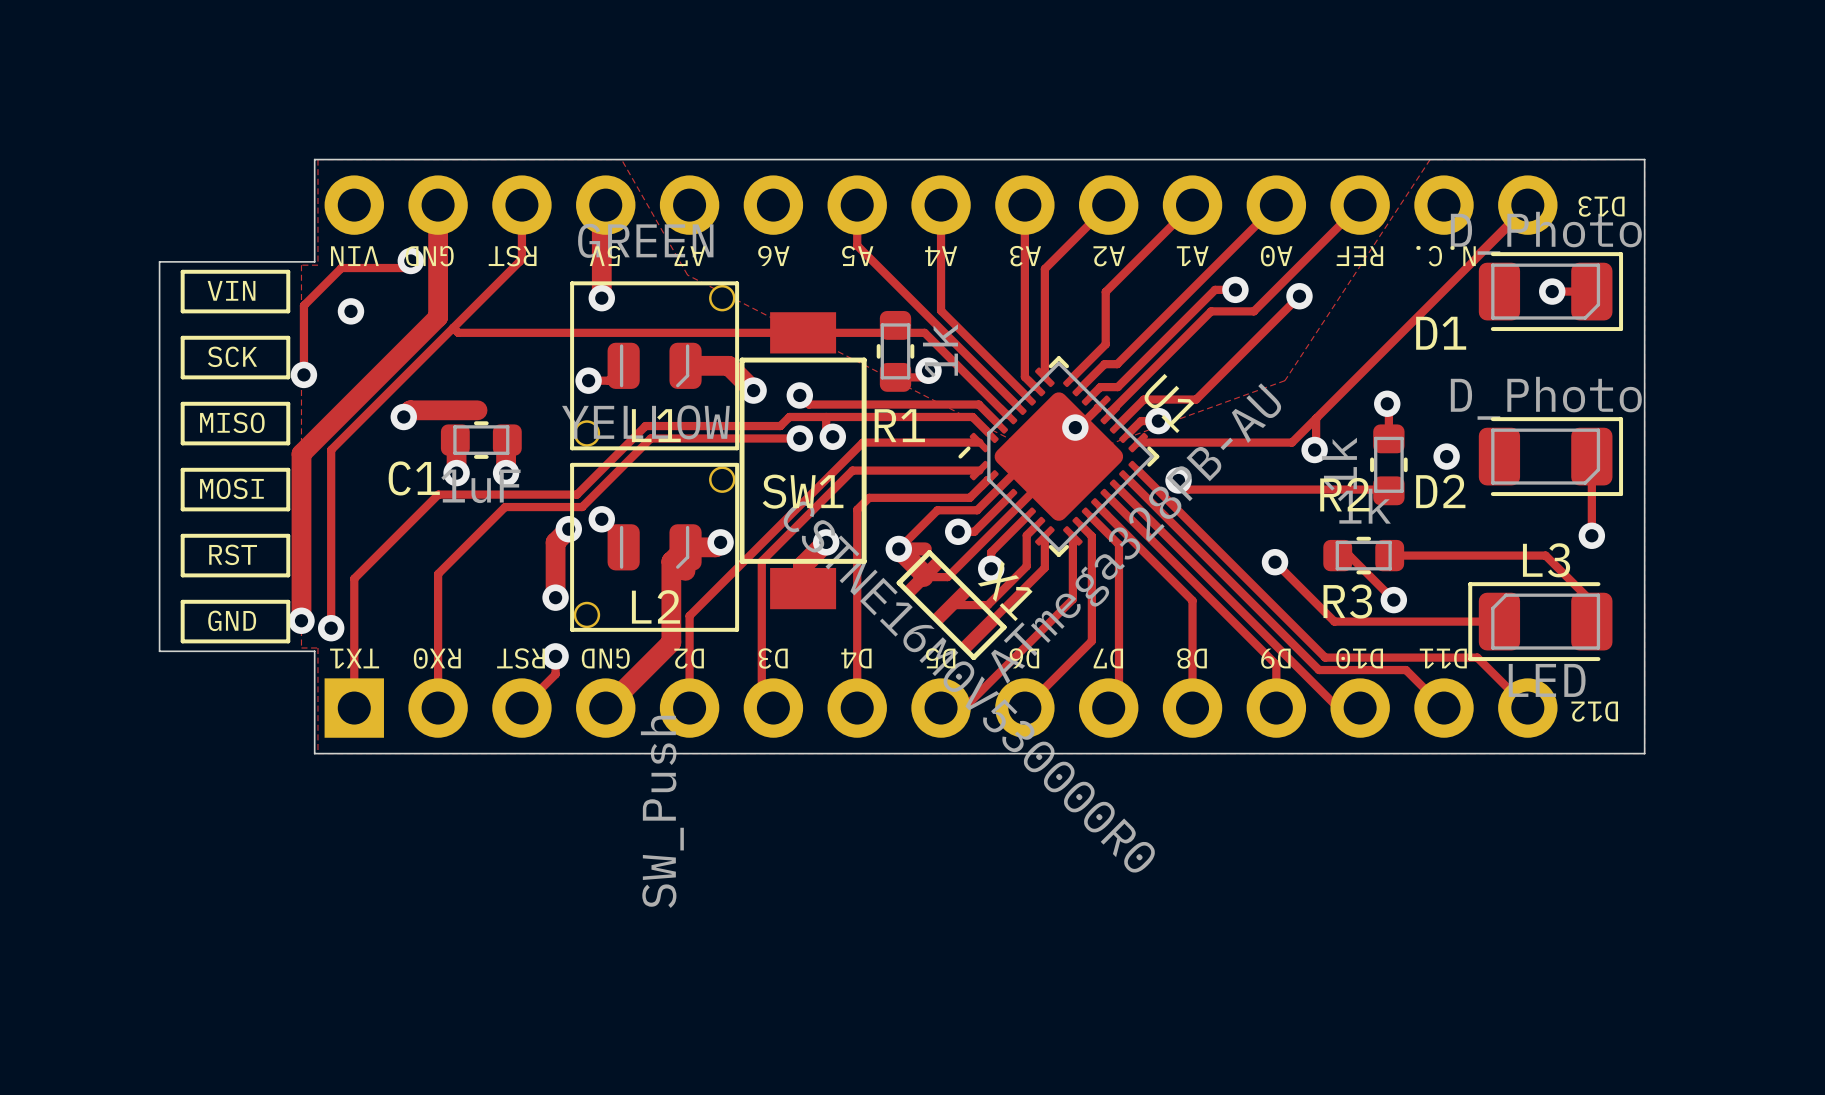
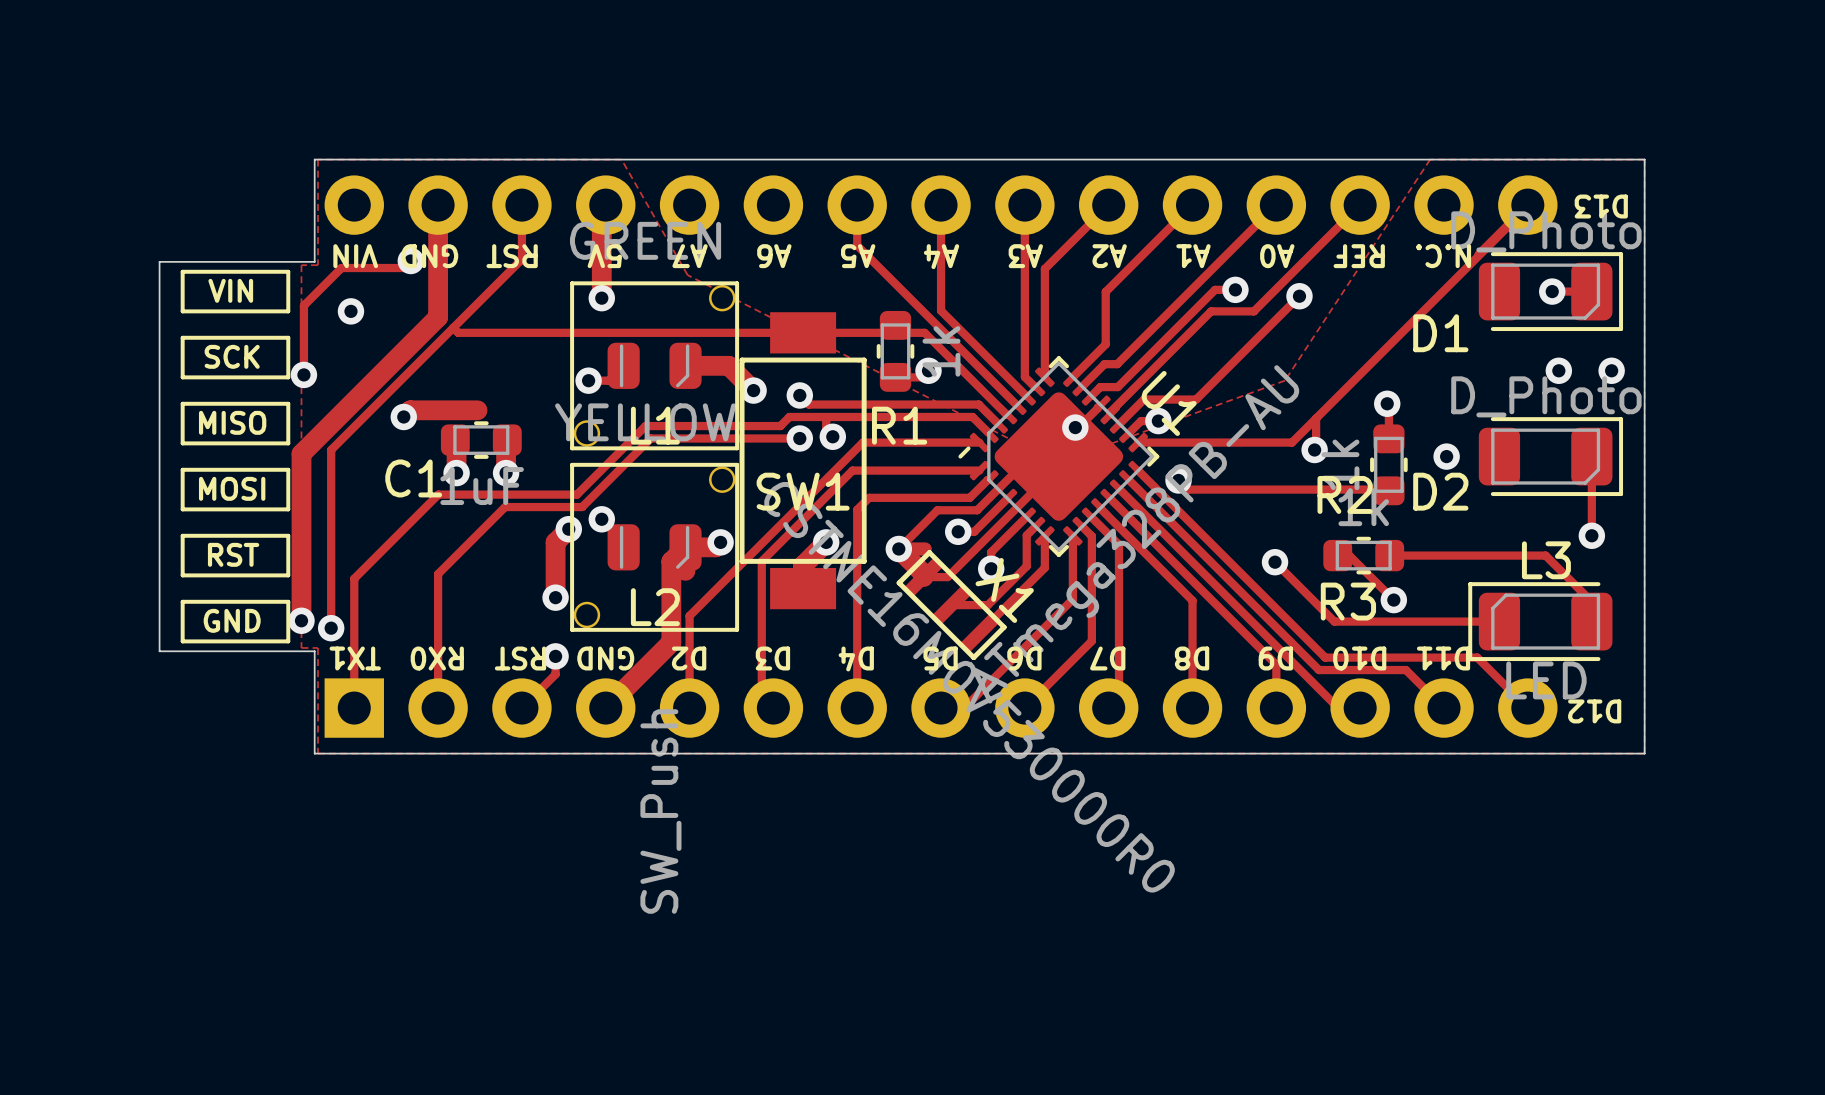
via: none -> (1558, 370)
via: none -> (1611, 370)

